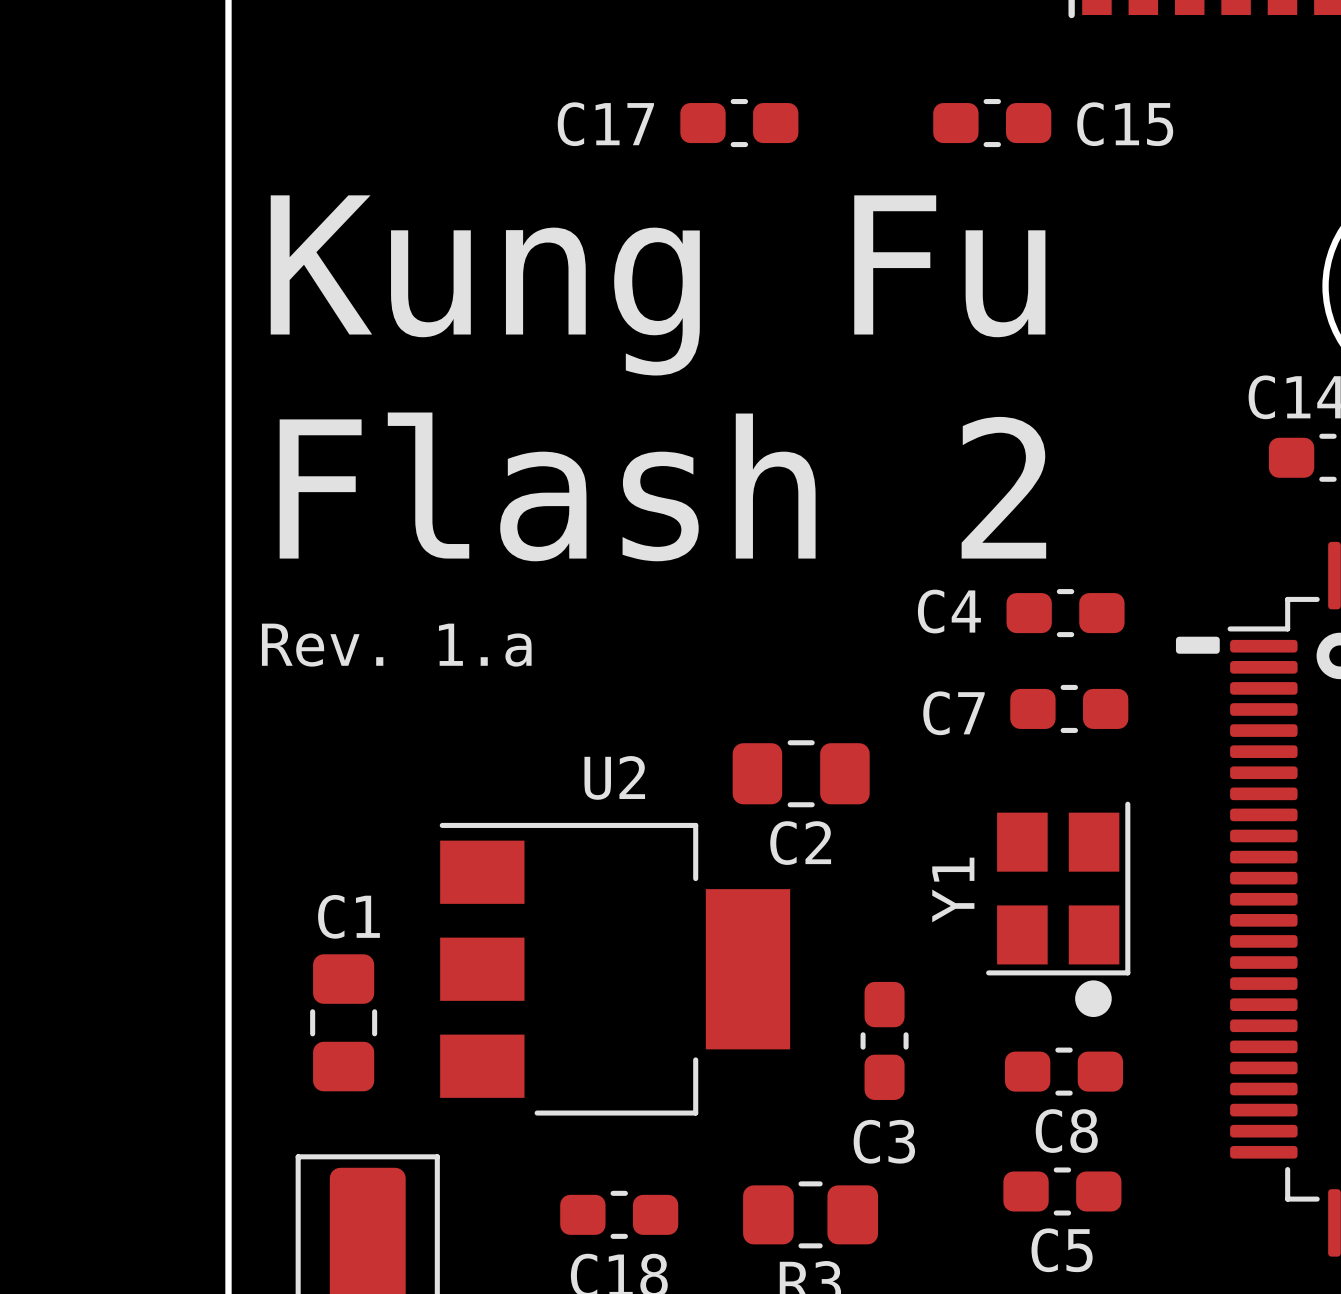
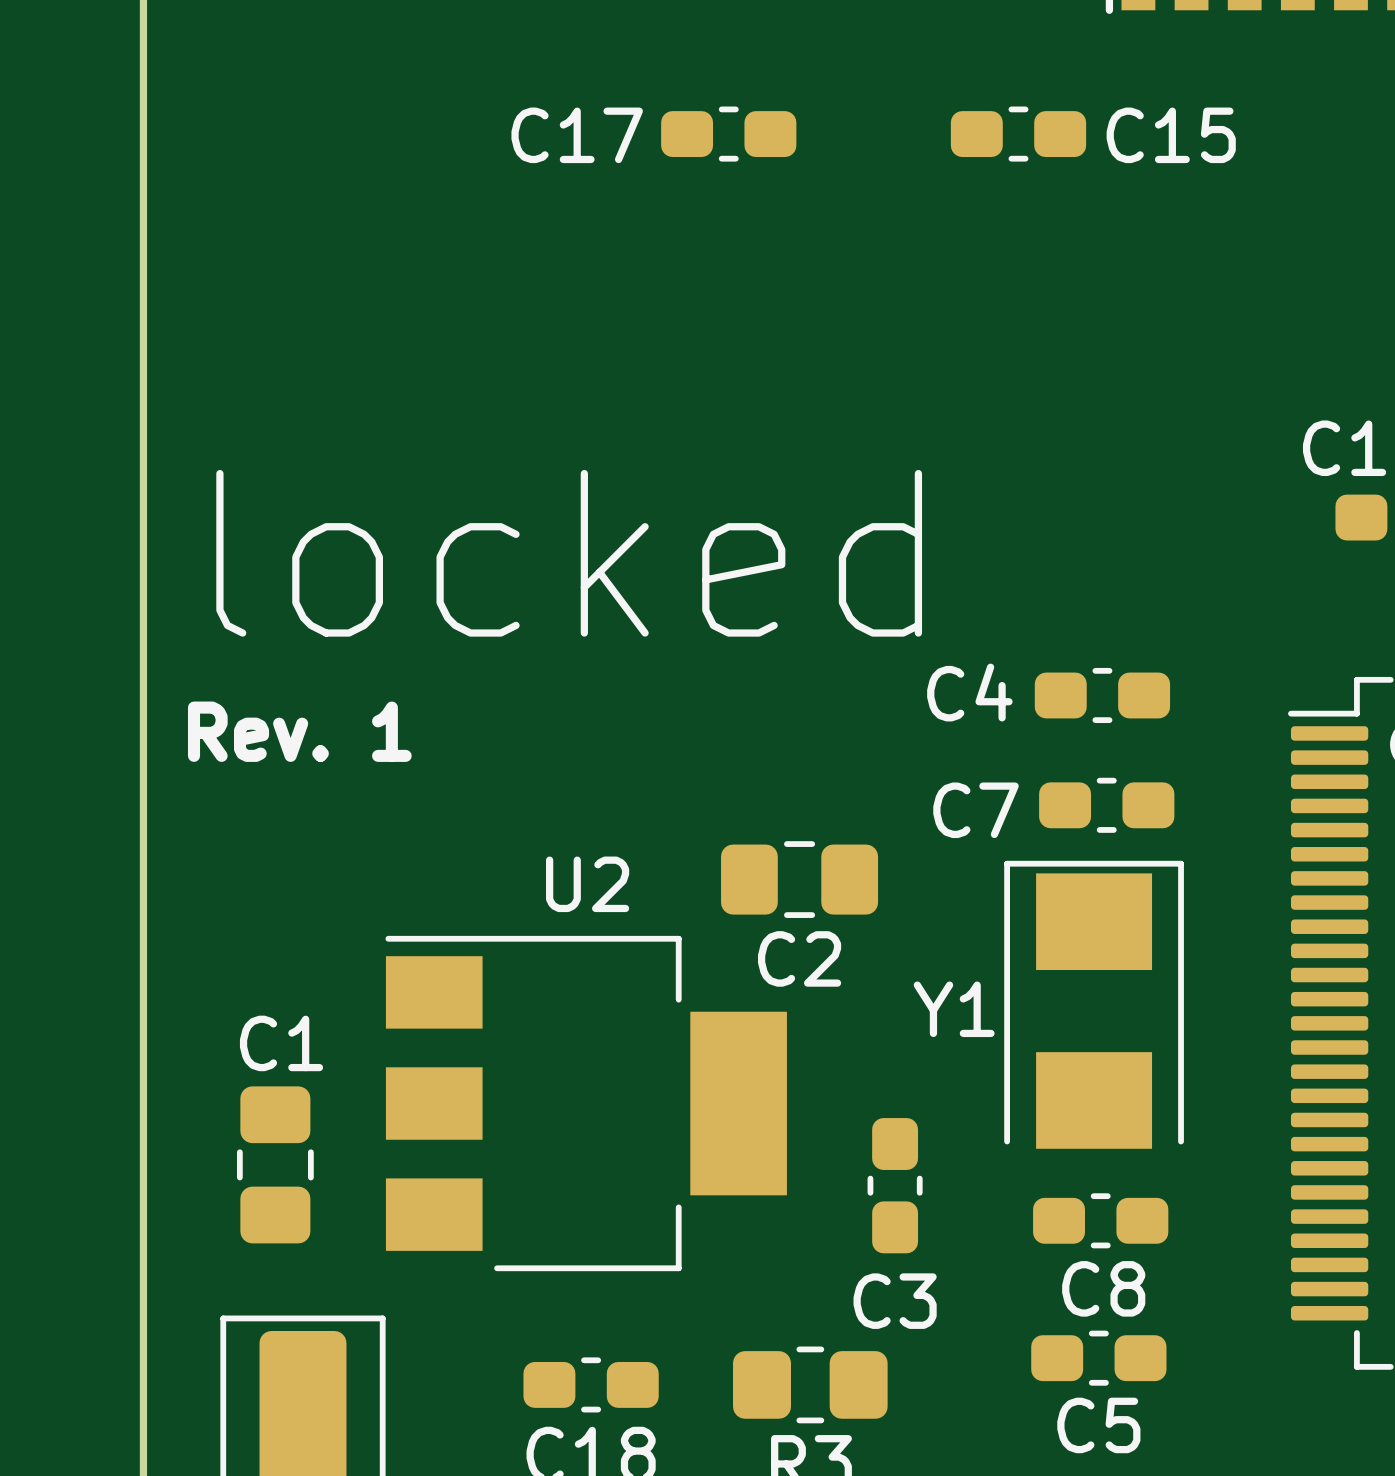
text: Kung Fu (658, 285) -> none
text: Flash 2 (662, 486) -> locked (569, 553)
drawing: [1175, 636, 1220, 654] -> none
text: Rev. 1.a (396, 645) -> Rev. 1 (299, 731)
Y1 footprint: [986, 801, 1131, 976] -> [1004, 860, 1184, 1149]
drawing: [1075, 980, 1112, 1018] -> none

